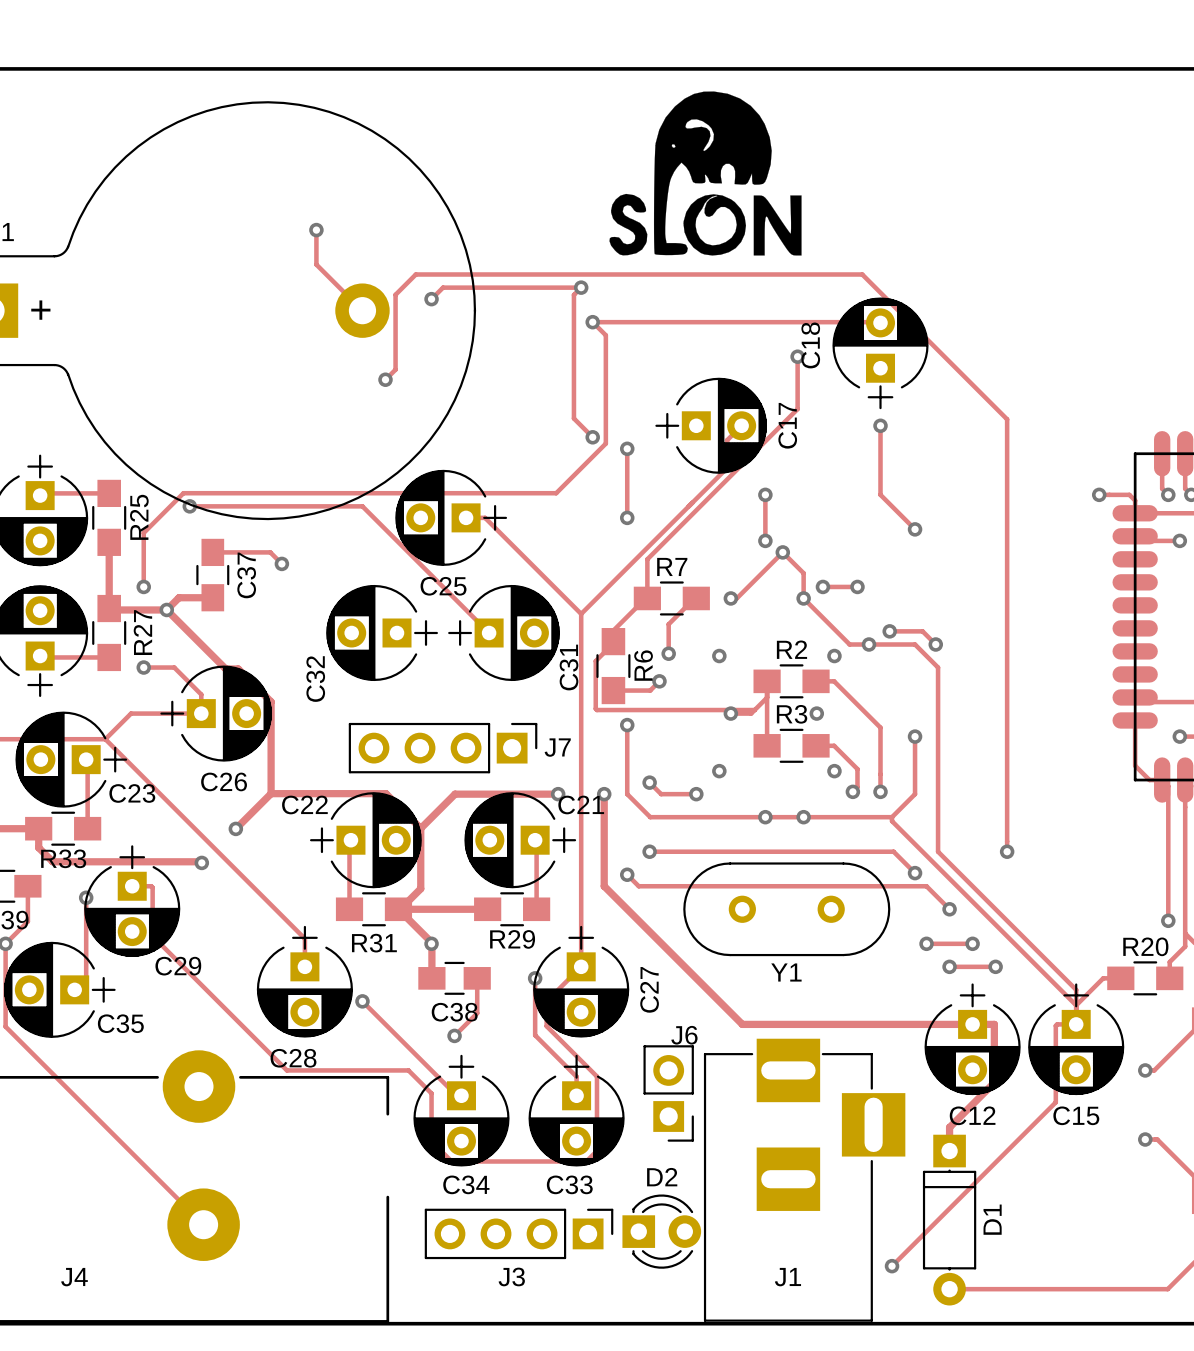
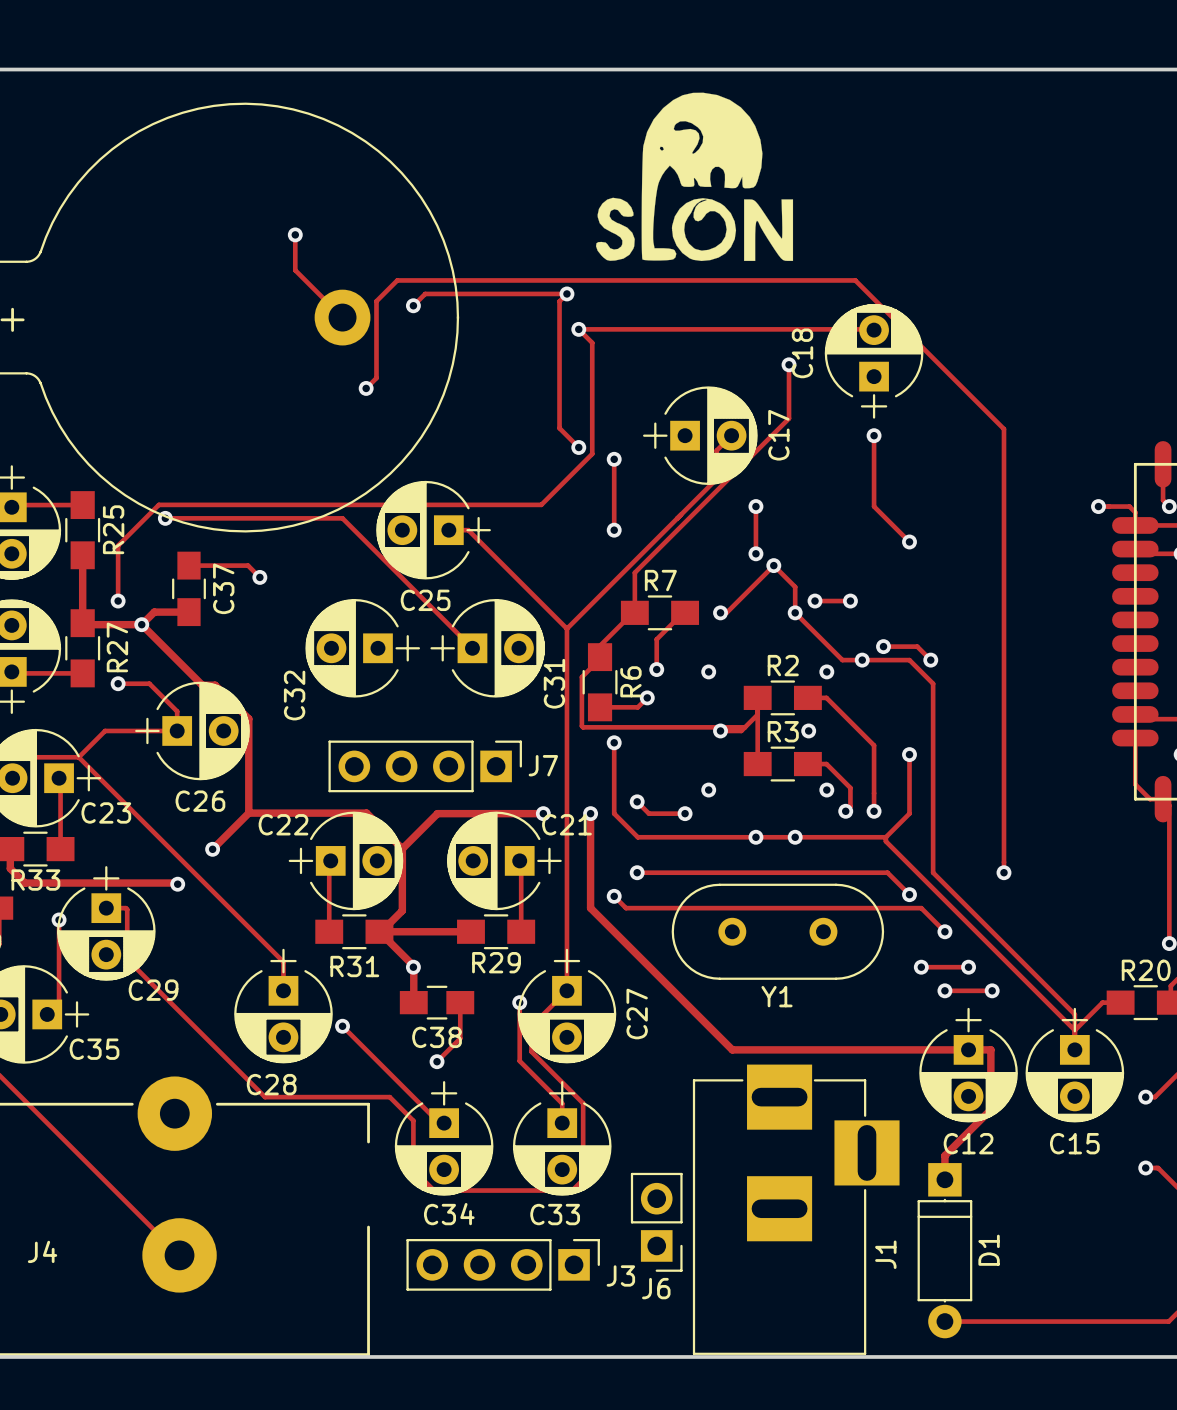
track: (1076, 1024) (1055, 1025) (1055, 1102) (892, 1266) -> none
J6 name position: J6 (684, 1035) -> J6 (656, 1288)
J6 position: (668, 1093) -> (656, 1222)
D2: (661, 1231) -> none
via: (892, 1266) -> none
J3 name position: J3 (511, 1276) -> J3 (620, 1275)
J4 name position: J4 (74, 1277) -> J4 (42, 1251)
J1 name rotation: 0° (787, 1277) -> 90° counterclockwise (885, 1254)
J1 name position: J1 (787, 1277) -> J1 (885, 1254)

